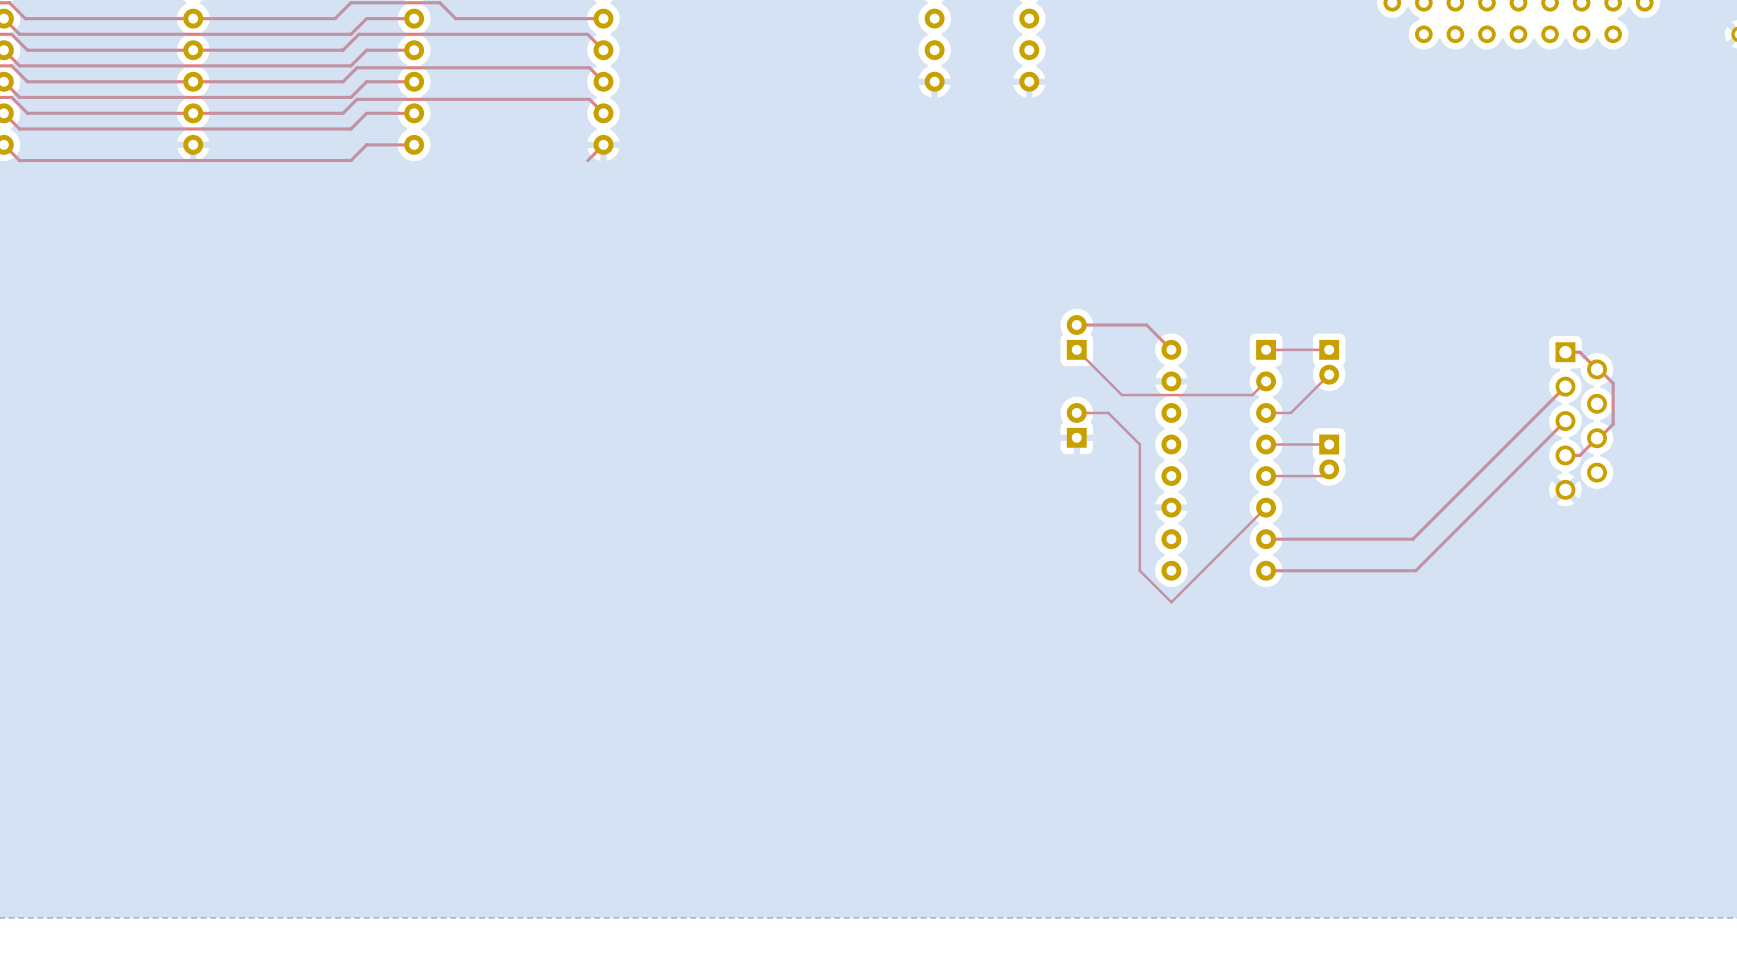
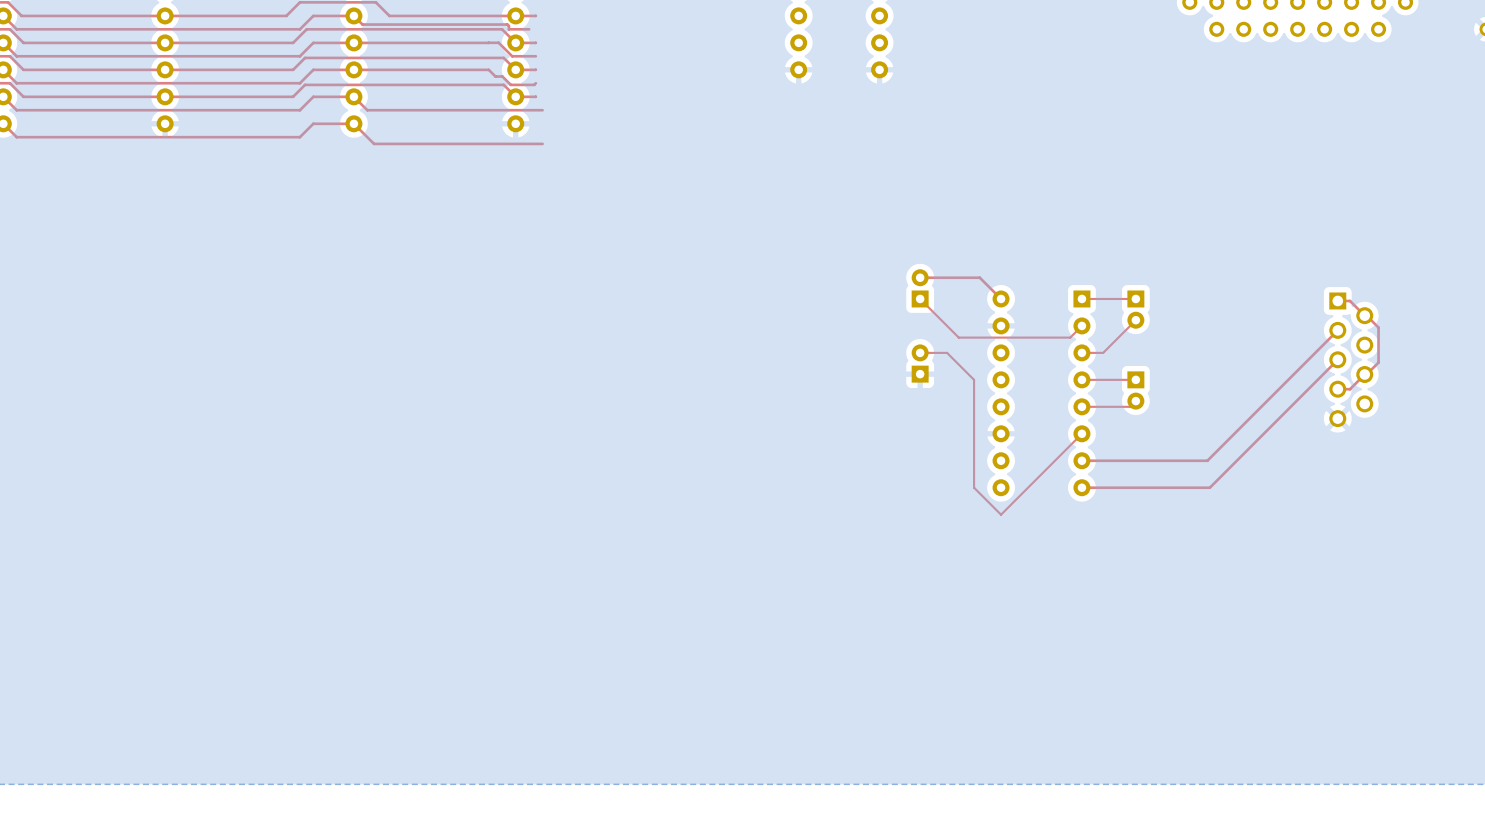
top track: none -> (353, 15) (362, 24) (507, 24) (508, 29) (529, 29)
top track: none -> (535, 15) (515, 15)
top track: none -> (488, 42) (498, 42) (512, 56) (535, 56)
top track: none -> (488, 42) (353, 42)
top track: none -> (535, 42) (515, 42)
top track: none -> (353, 69) (488, 69) (495, 76) (502, 76) (510, 84) (534, 84) (535, 83)
top track: none -> (535, 69) (515, 69)
top track: none -> (353, 96) (367, 110) (542, 110)
top track: none -> (535, 96) (515, 96)
top track: none -> (353, 123) (374, 143) (542, 143)
top track: (603, 144) (587, 160) -> none

